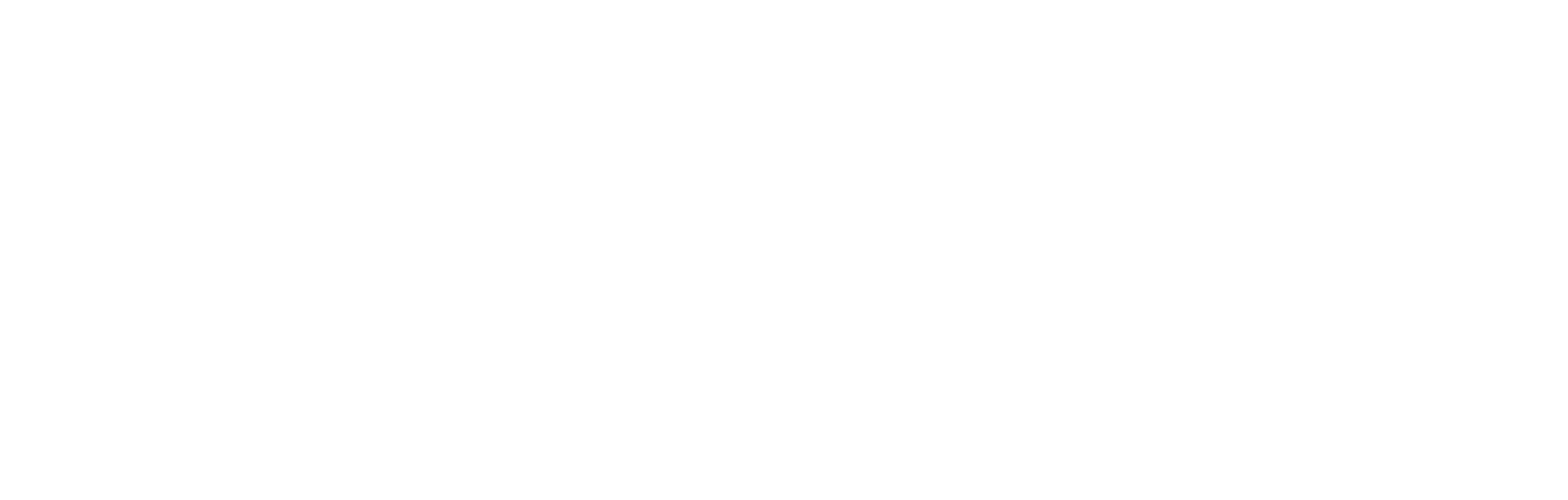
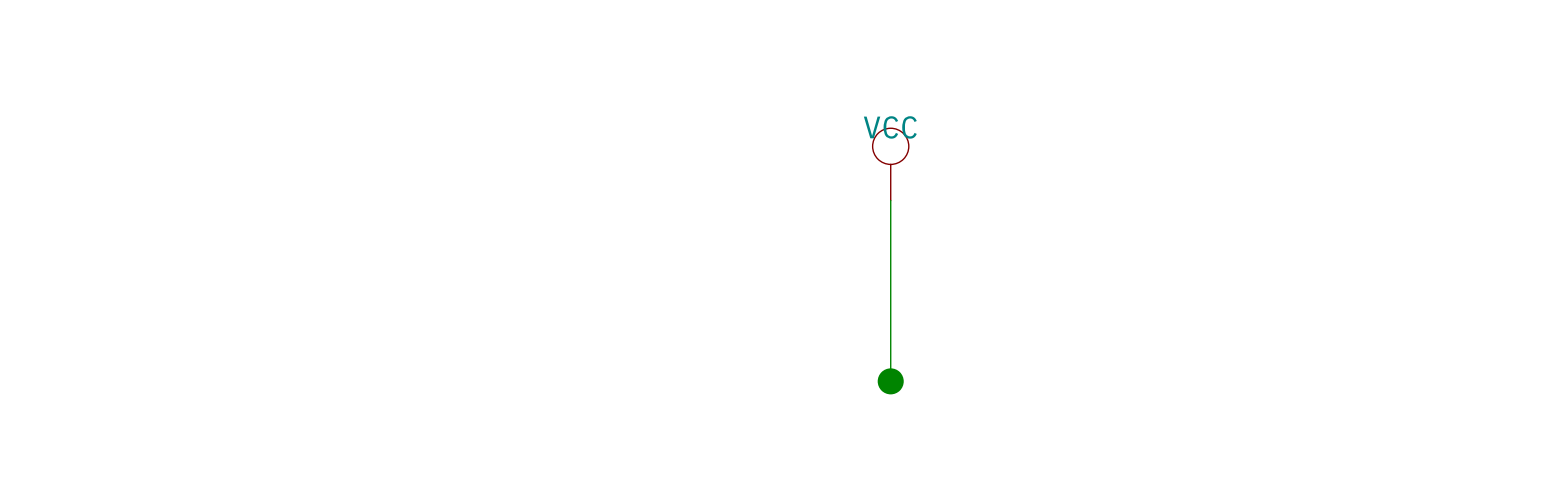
power symbol: none -> VCC (890, 164)
wire: none -> (890, 200) (890, 381)
junction: none -> (890, 381)

